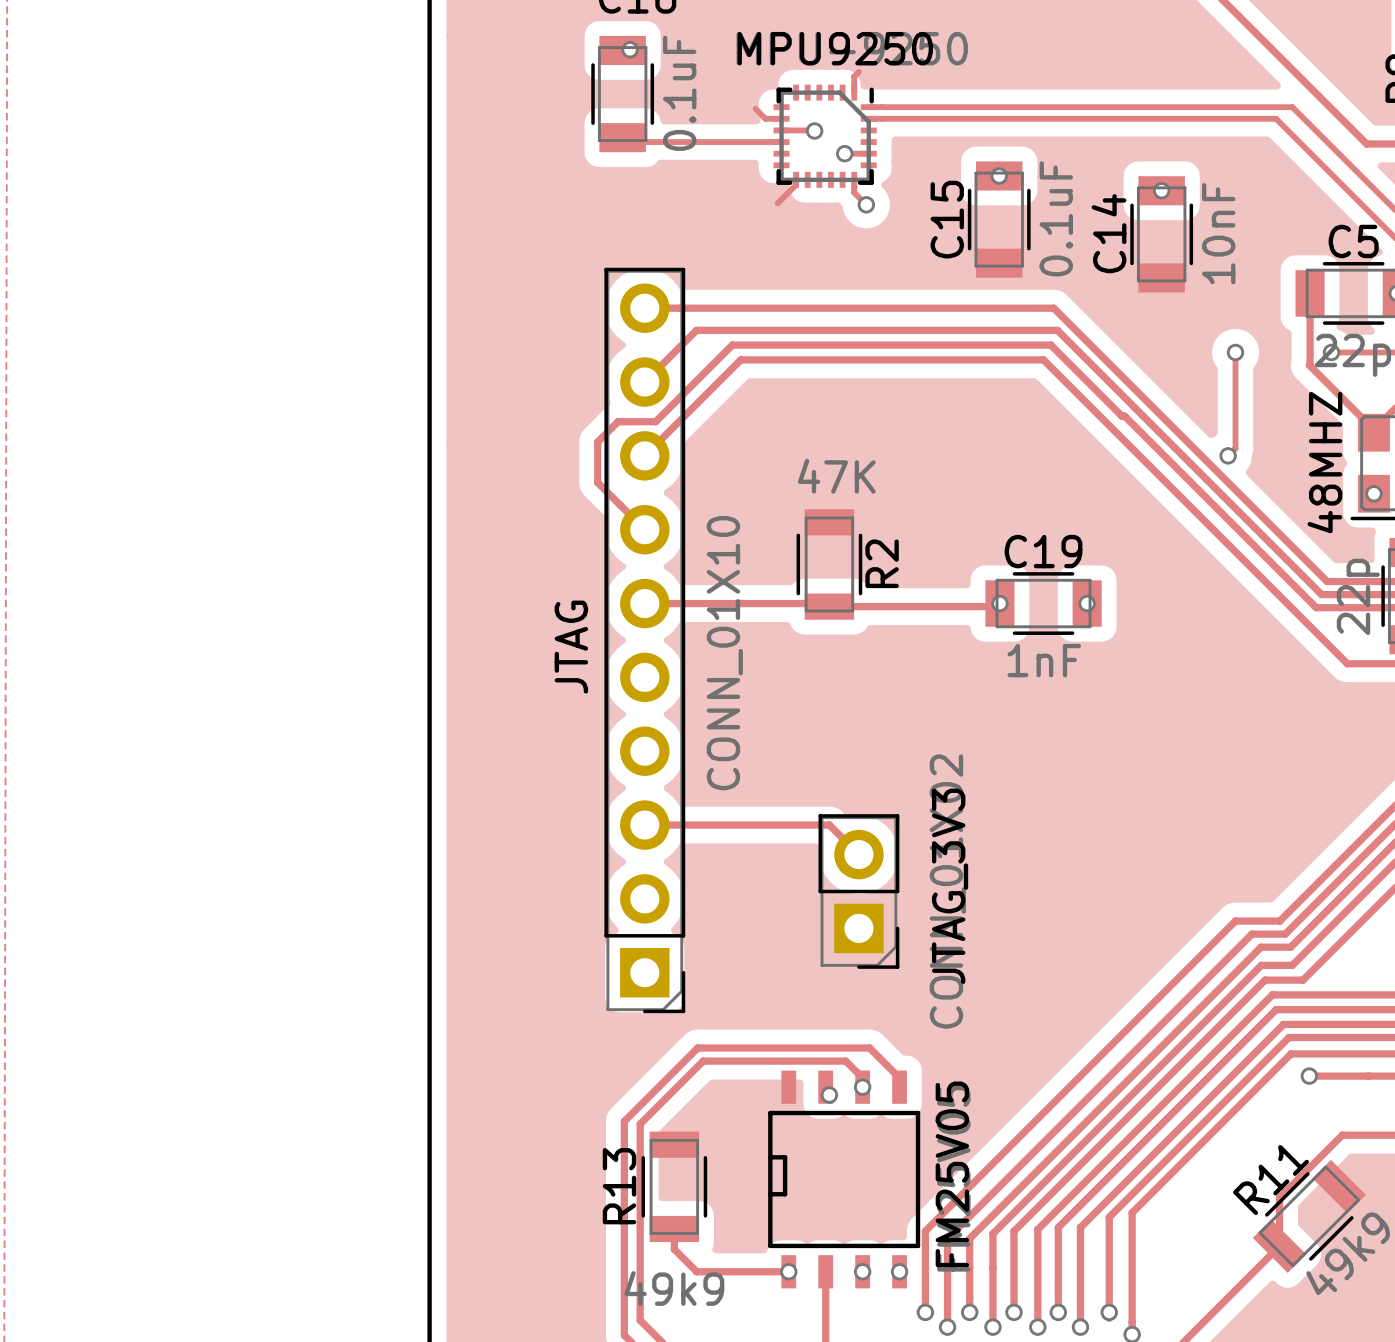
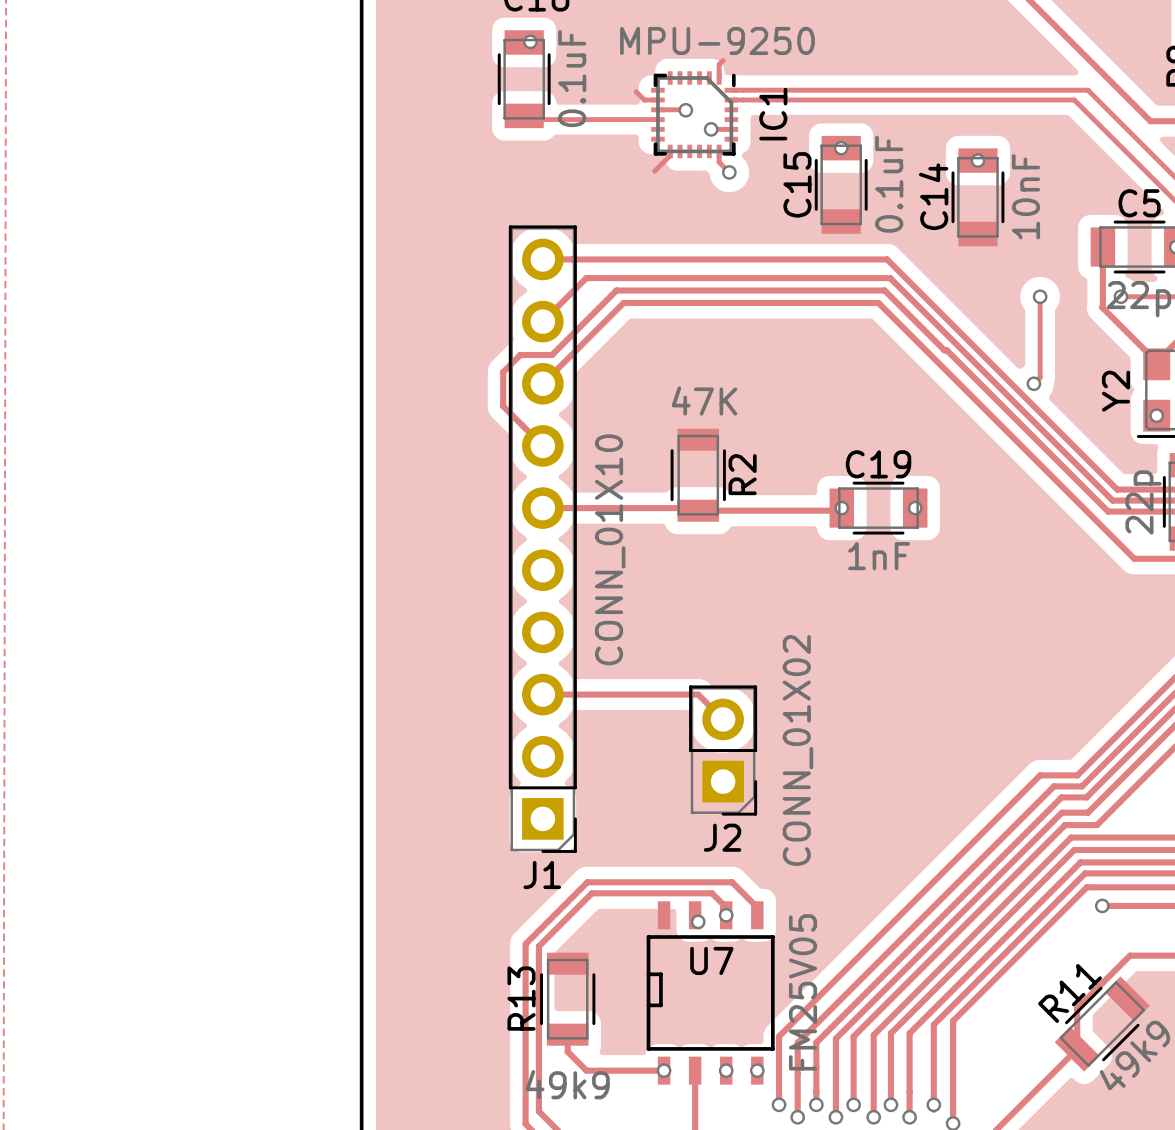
MPU9250 name: MPU9250 (835, 48) -> IC1 (773, 114)
48MHZ name: 48MHZ (1324, 462) -> Y2 (1116, 391)
JTAG name: JTAG (571, 647) -> J1 (542, 875)
JTAG_3V3 name: JTAG_3V3 (950, 886) -> J2 (722, 837)
FM25V05 name: FM25V05 (952, 1174) -> U7 (711, 960)

